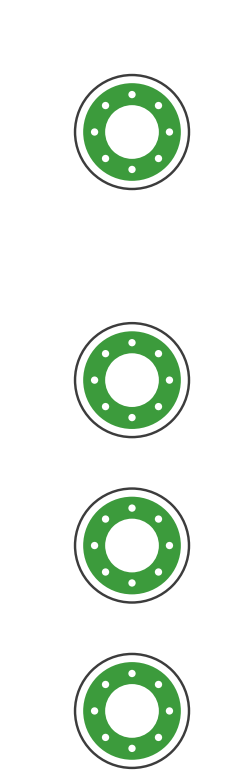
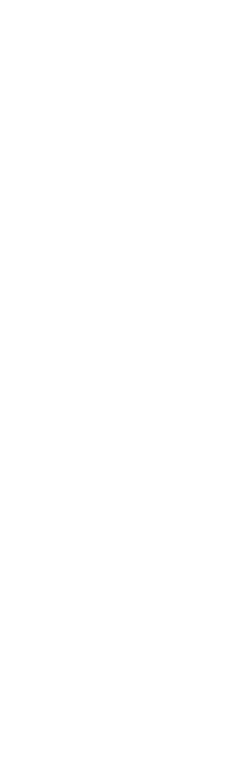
part: (132, 132) -> none
part: (132, 380) -> none
part: (132, 545) -> none
part: (132, 710) -> none

